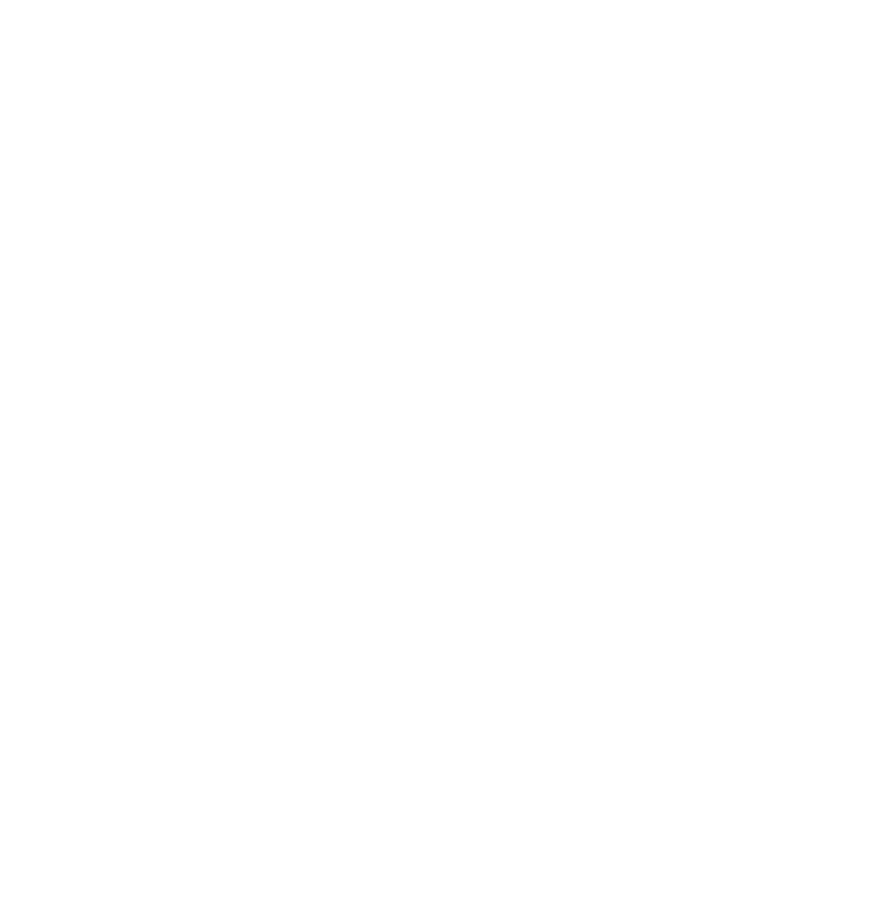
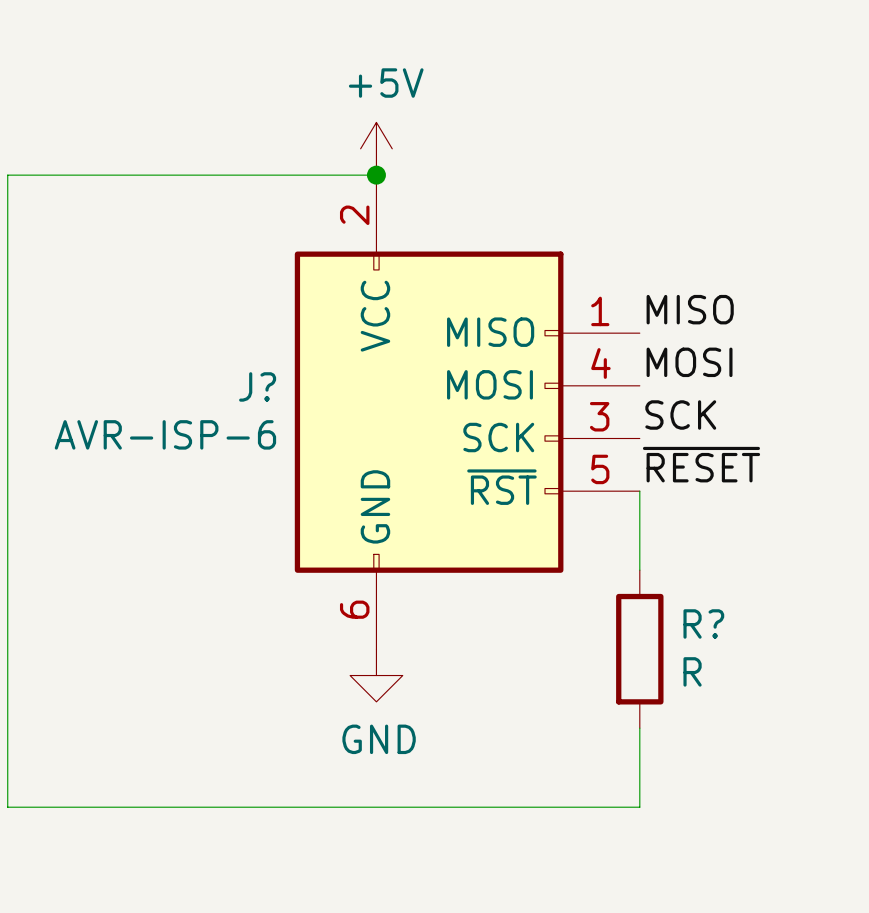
power symbol: none -> +5V (376, 148)
wire: none -> (376, 175) (7, 175) (7, 807) (639, 807) (639, 728)
junction: none -> (376, 175)
label: none -> MISO (690, 309)
label: none -> MOSI (689, 362)
J?: none -> AVR-ISP-6 (467, 412)
label: none -> SCK (680, 415)
label: none -> ~{RESET} (701, 464)
wire: none -> (639, 491) (639, 570)
R?: none -> R (639, 649)
power symbol: none -> GND (376, 675)

